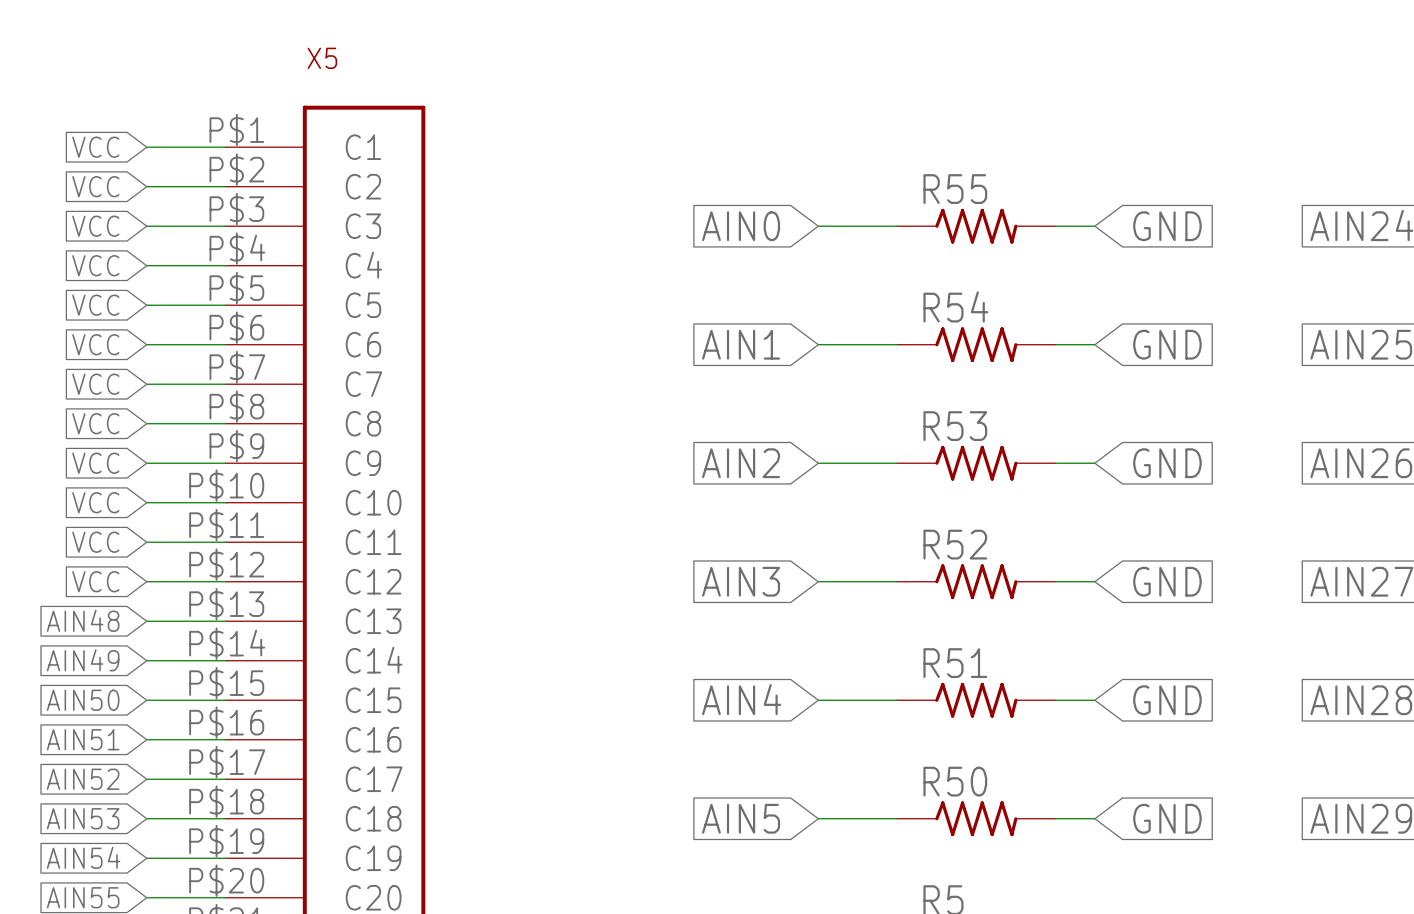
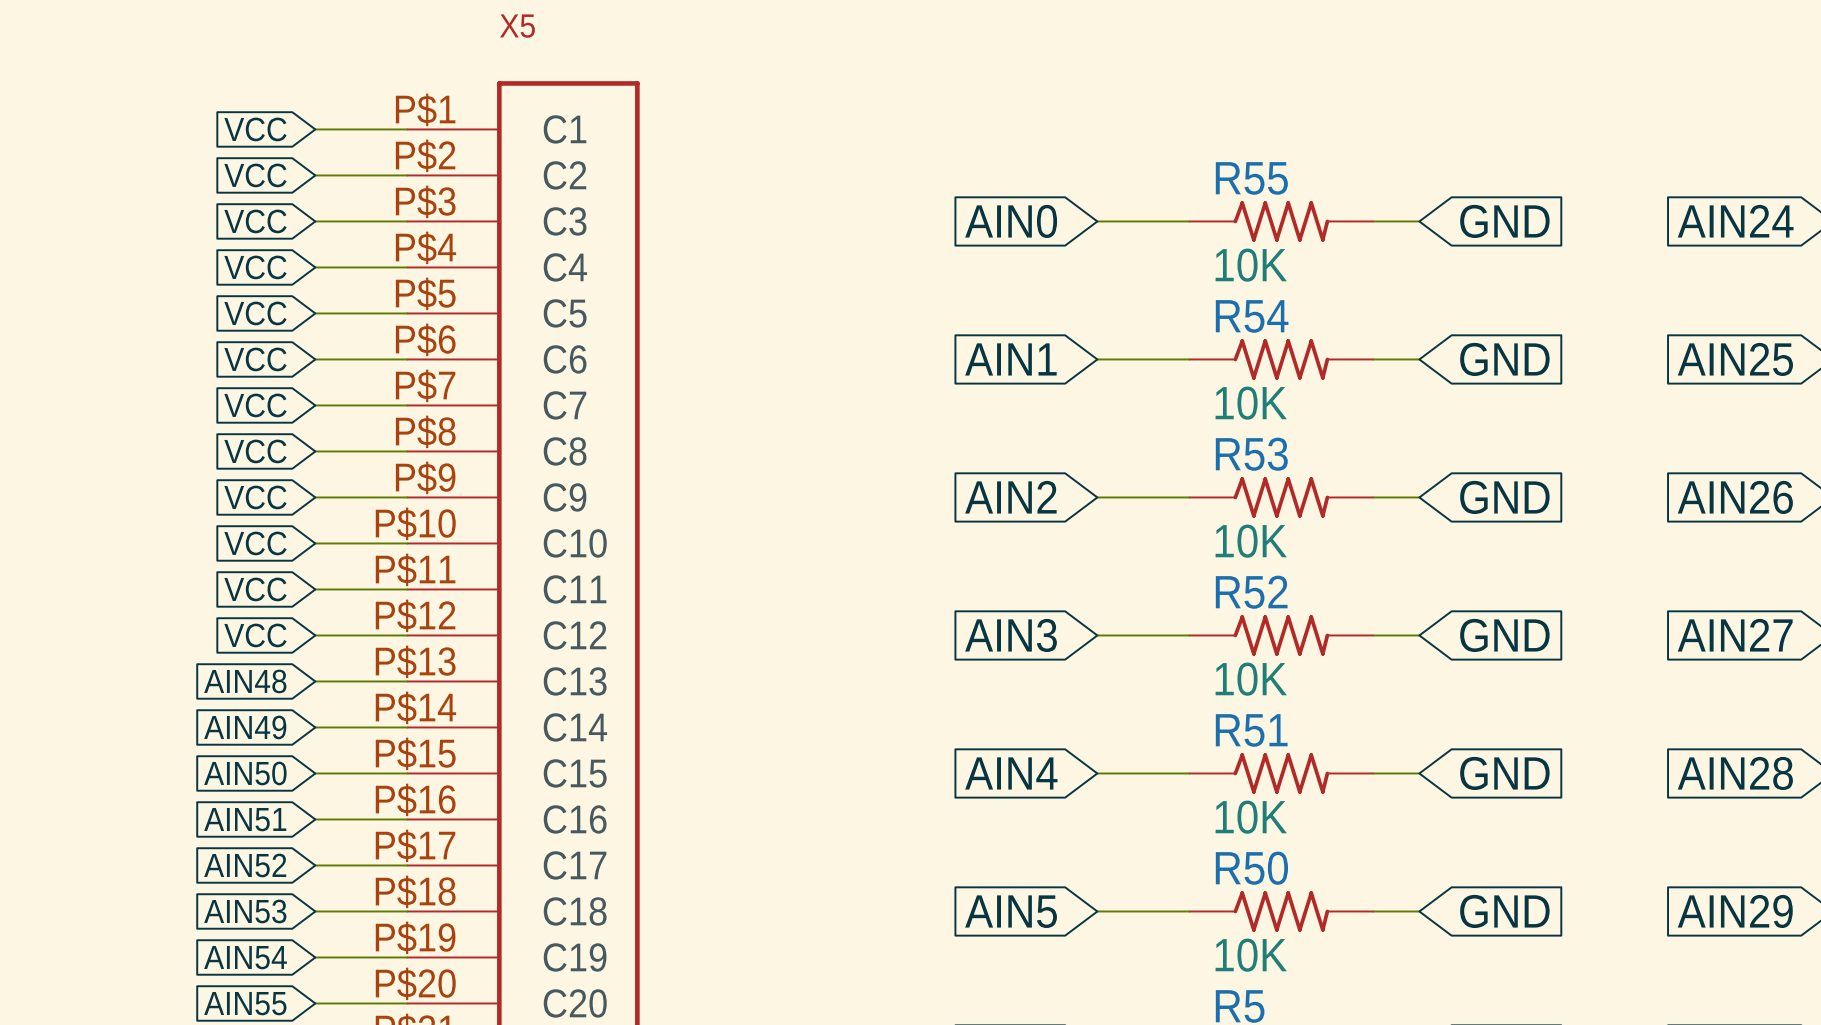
R55 value: none -> 10K (1251, 265)
R54 value: none -> 10K (1251, 403)
R53 value: none -> 10K (1251, 541)
R52 value: none -> 10K (1251, 679)
R51 value: none -> 10K (1251, 817)
R50 value: none -> 10K (1251, 955)

